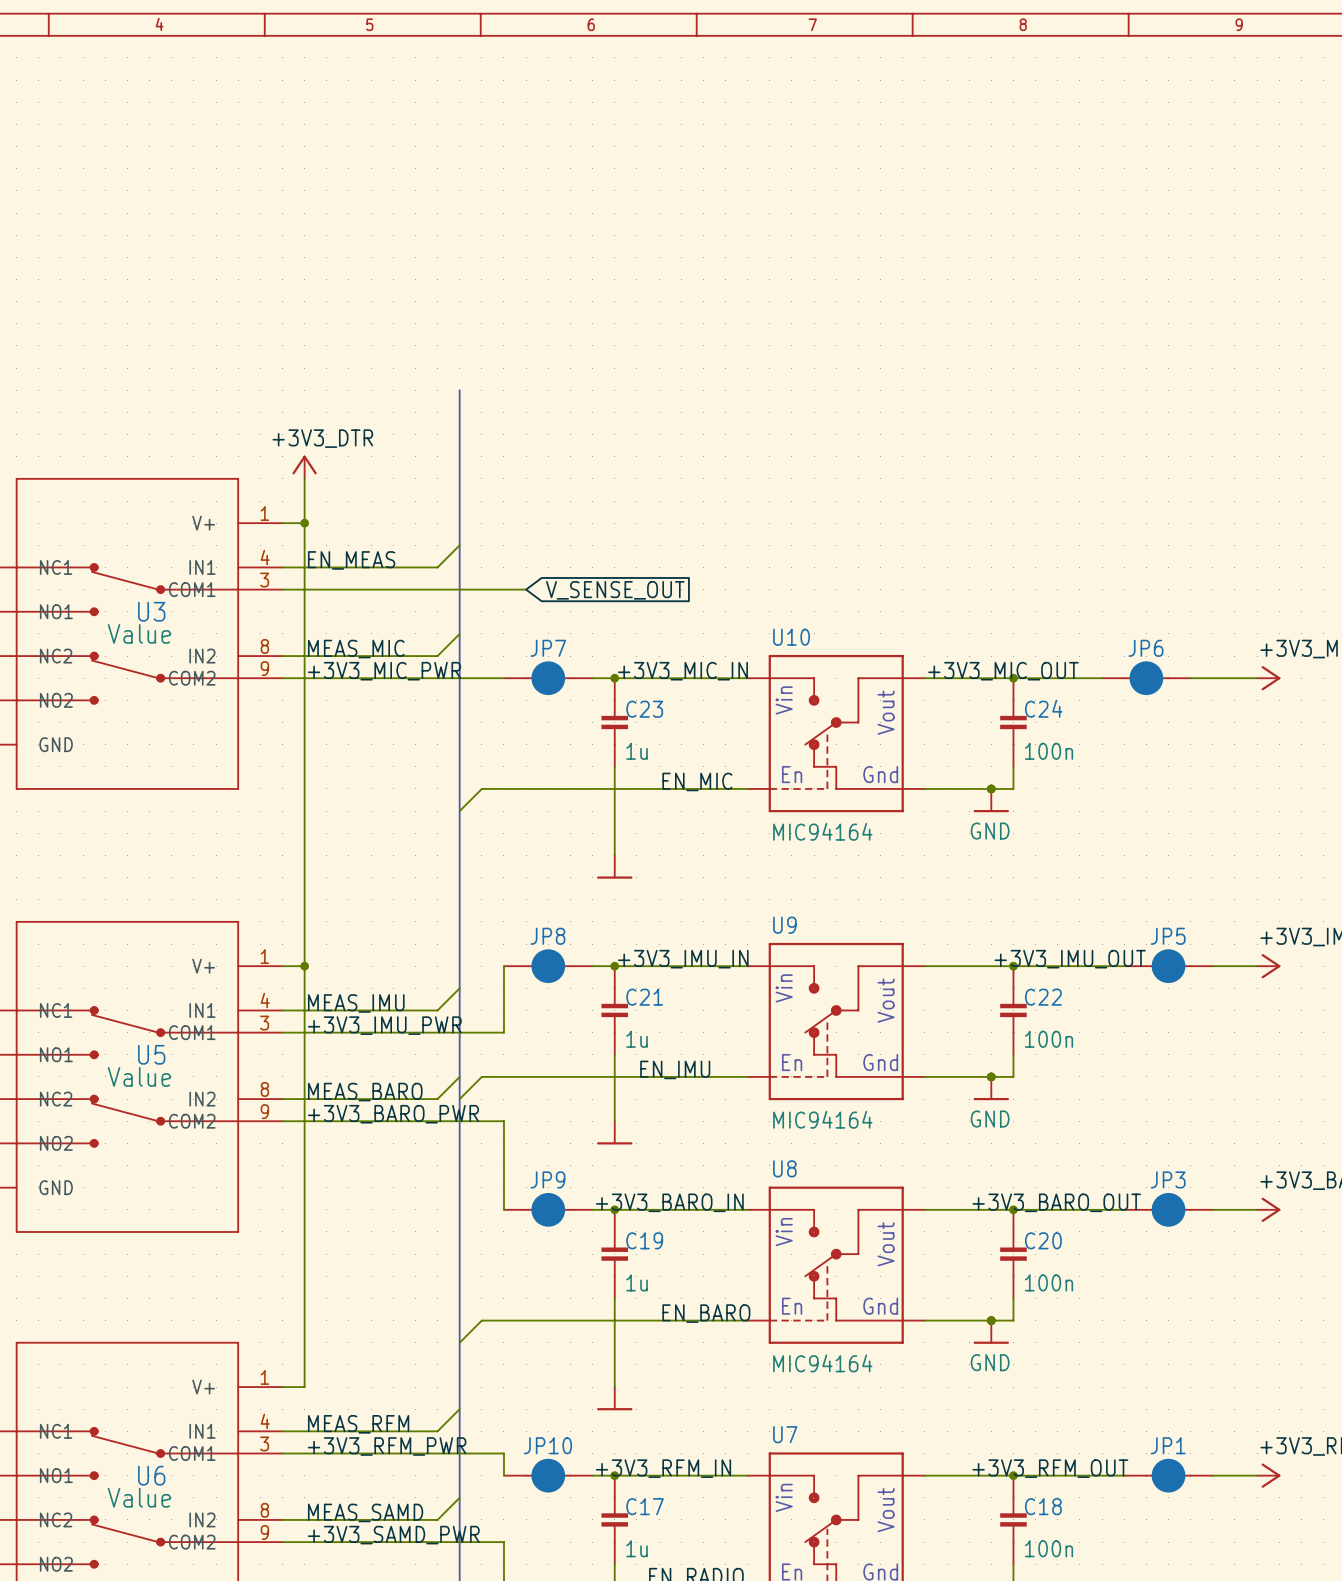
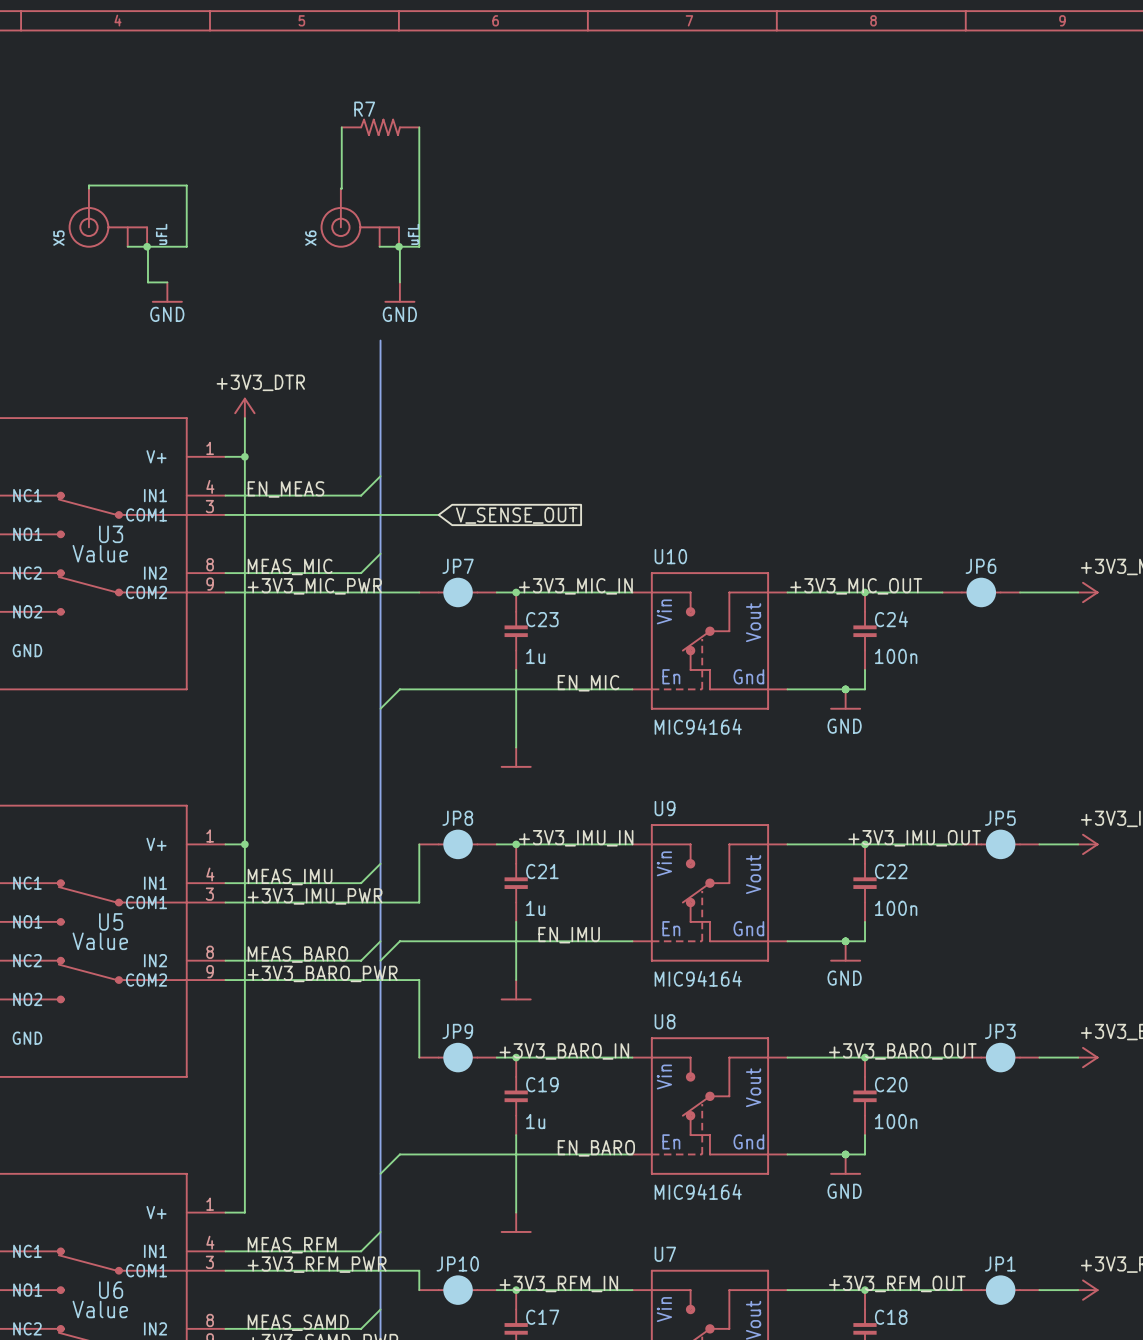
wire: none -> (341, 127) (340, 188)
R7: none -> (380, 127)
wire: none -> (419, 127) (419, 246) (379, 246)
wire: none -> (88, 188) (88, 185) (186, 185) (186, 246) (127, 246)
X5: none -> uFL (108, 218)
X6: none -> uFL (360, 218)
junction: none -> (147, 246)
wire: none -> (147, 246) (147, 282) (167, 282)
junction: none -> (399, 246)
wire: none -> (399, 246) (399, 282)
power symbol: none -> GND (167, 292)
power symbol: none -> GND (399, 292)

